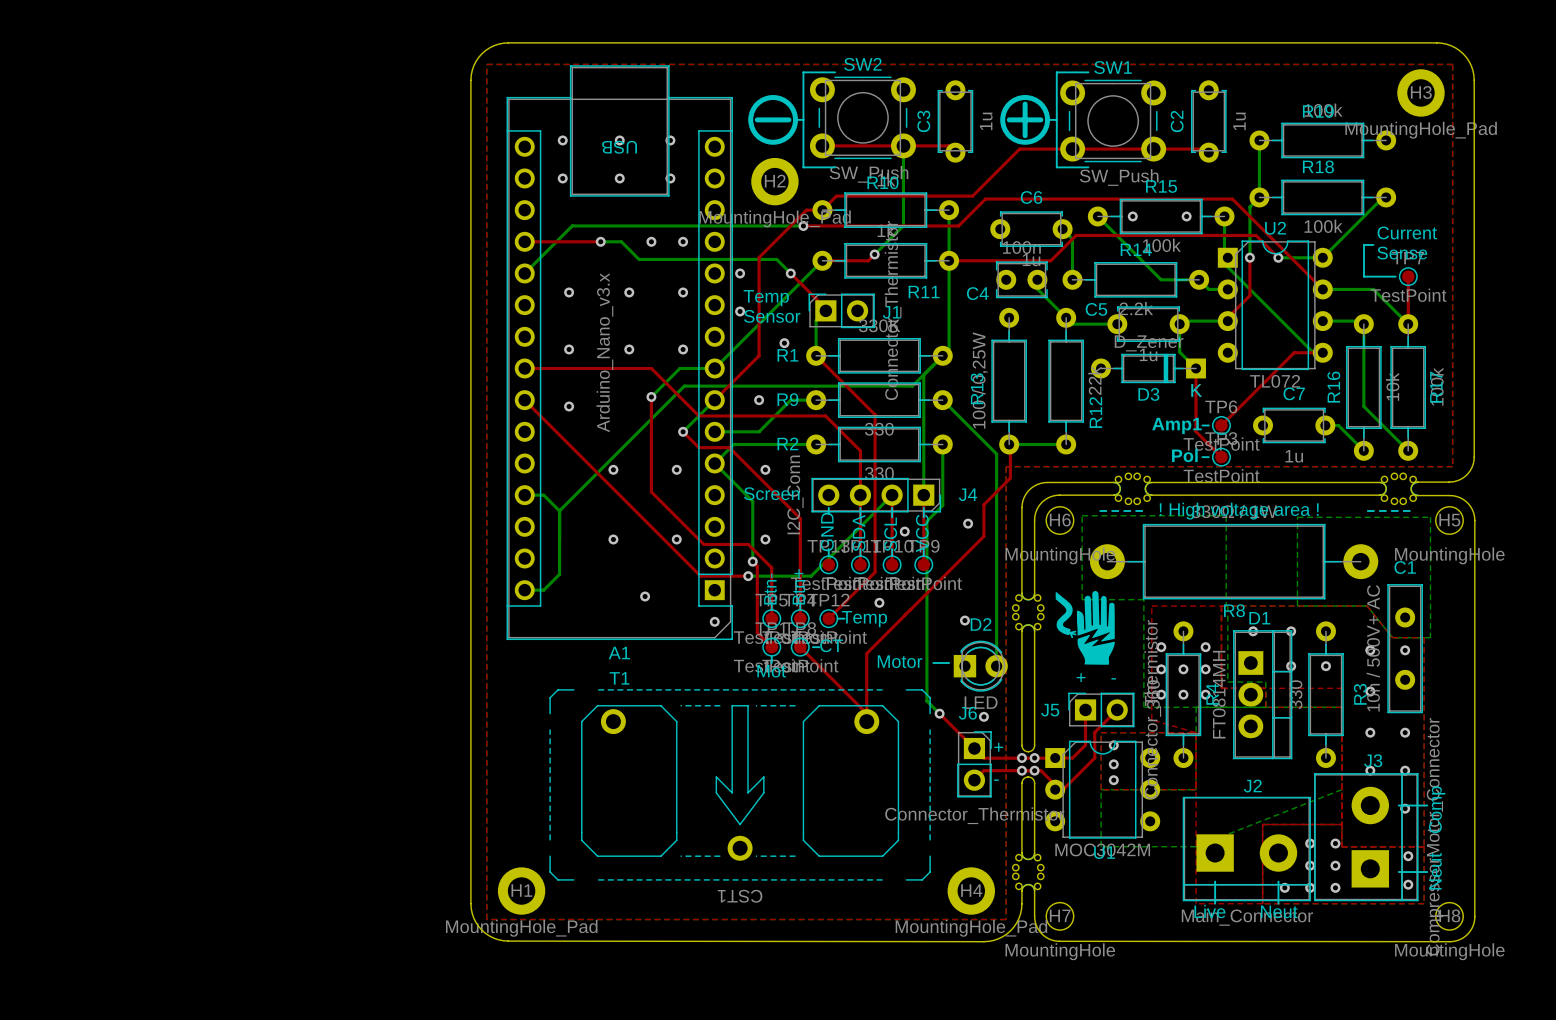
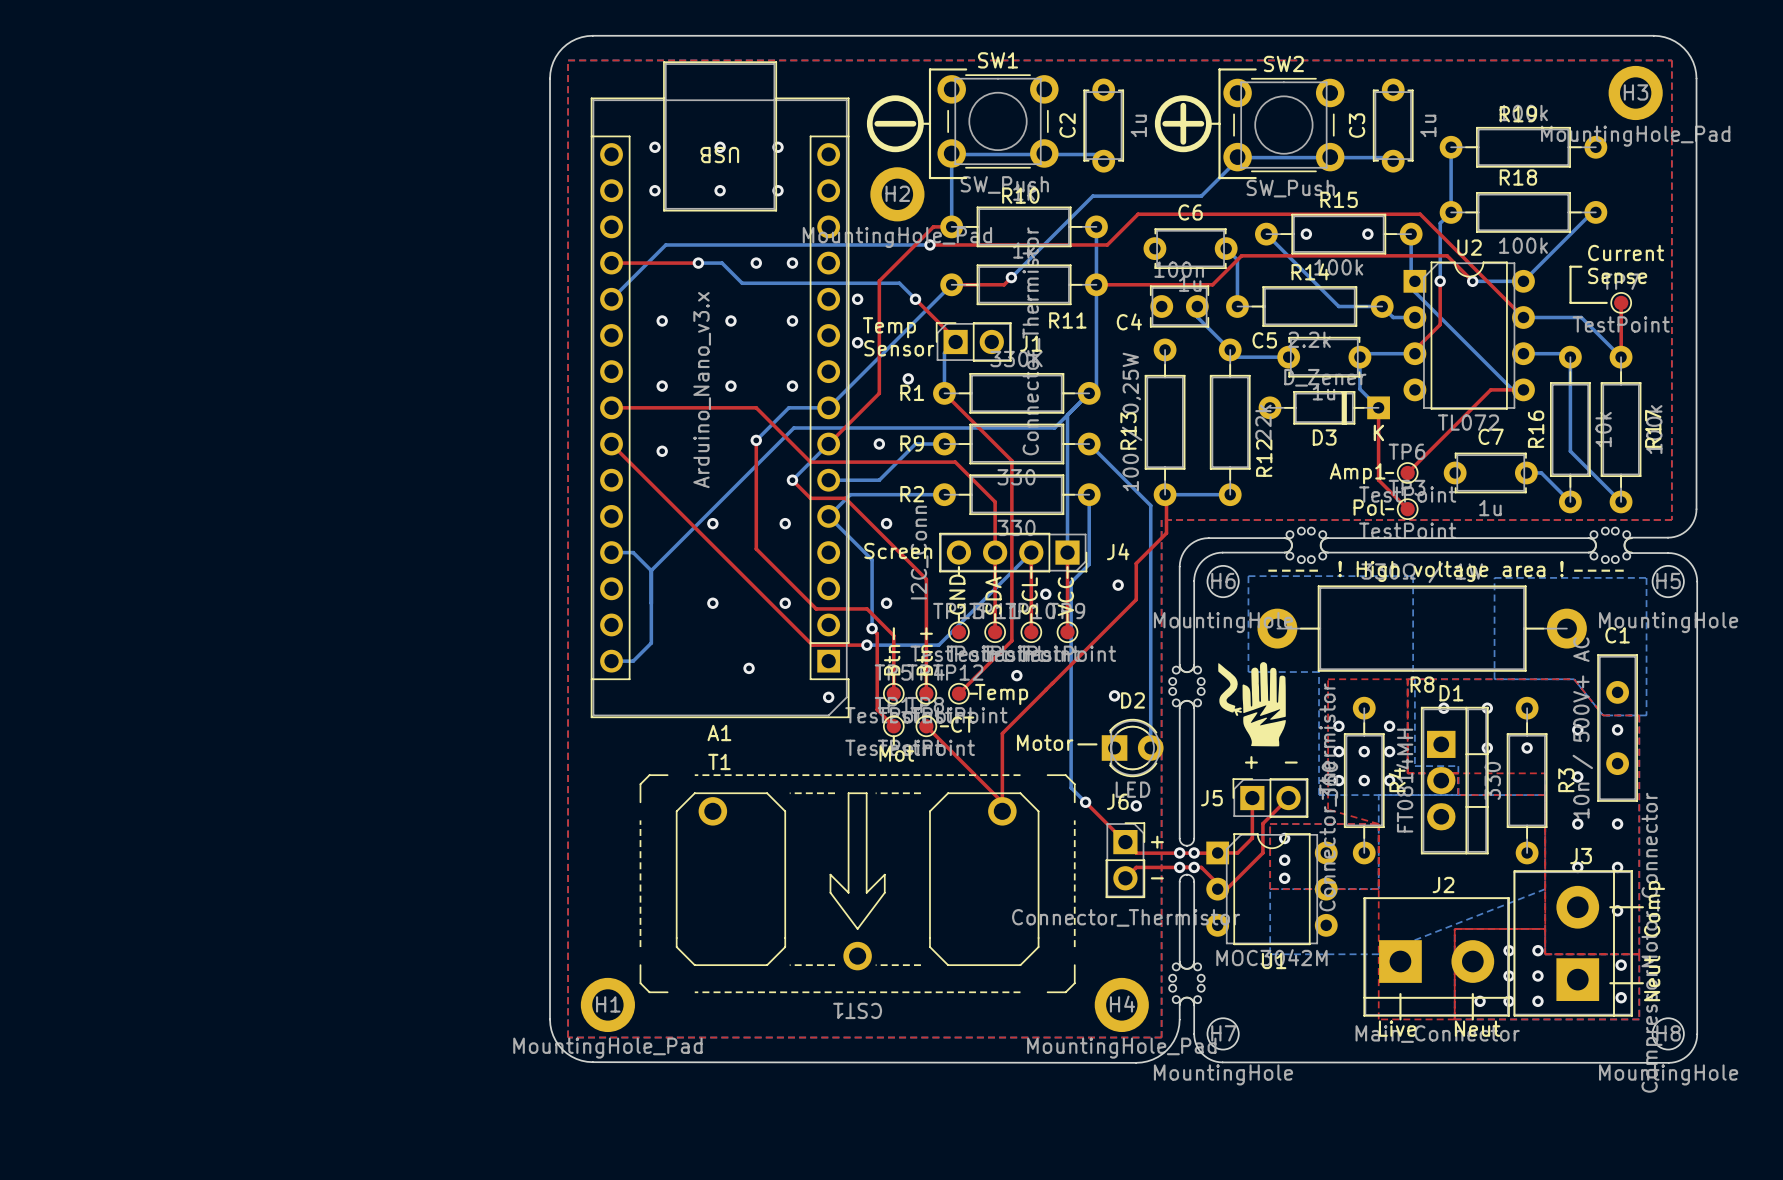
SW2 name: SW2 (862, 64) -> SW1 (998, 60)
SW1 name: SW1 (1113, 67) -> SW2 (1283, 63)
C3 name: C3 (923, 121) -> C2 (1067, 125)
C2 name: C2 (1177, 121) -> C3 (1357, 125)
top track: (822, 145) (948, 145) (955, 152) -> none
bottom track: (903, 145) (903, 225) -> (1393, 160) (1390, 157) (1238, 157) (1201, 196) (1092, 196) (1044, 244)
bottom track: none -> (1103, 161) (1097, 154) (953, 154) (951, 226)
top track: (1208, 152) (1205, 149) (1019, 149) (972, 196) (836, 196) (822, 210) -> none

